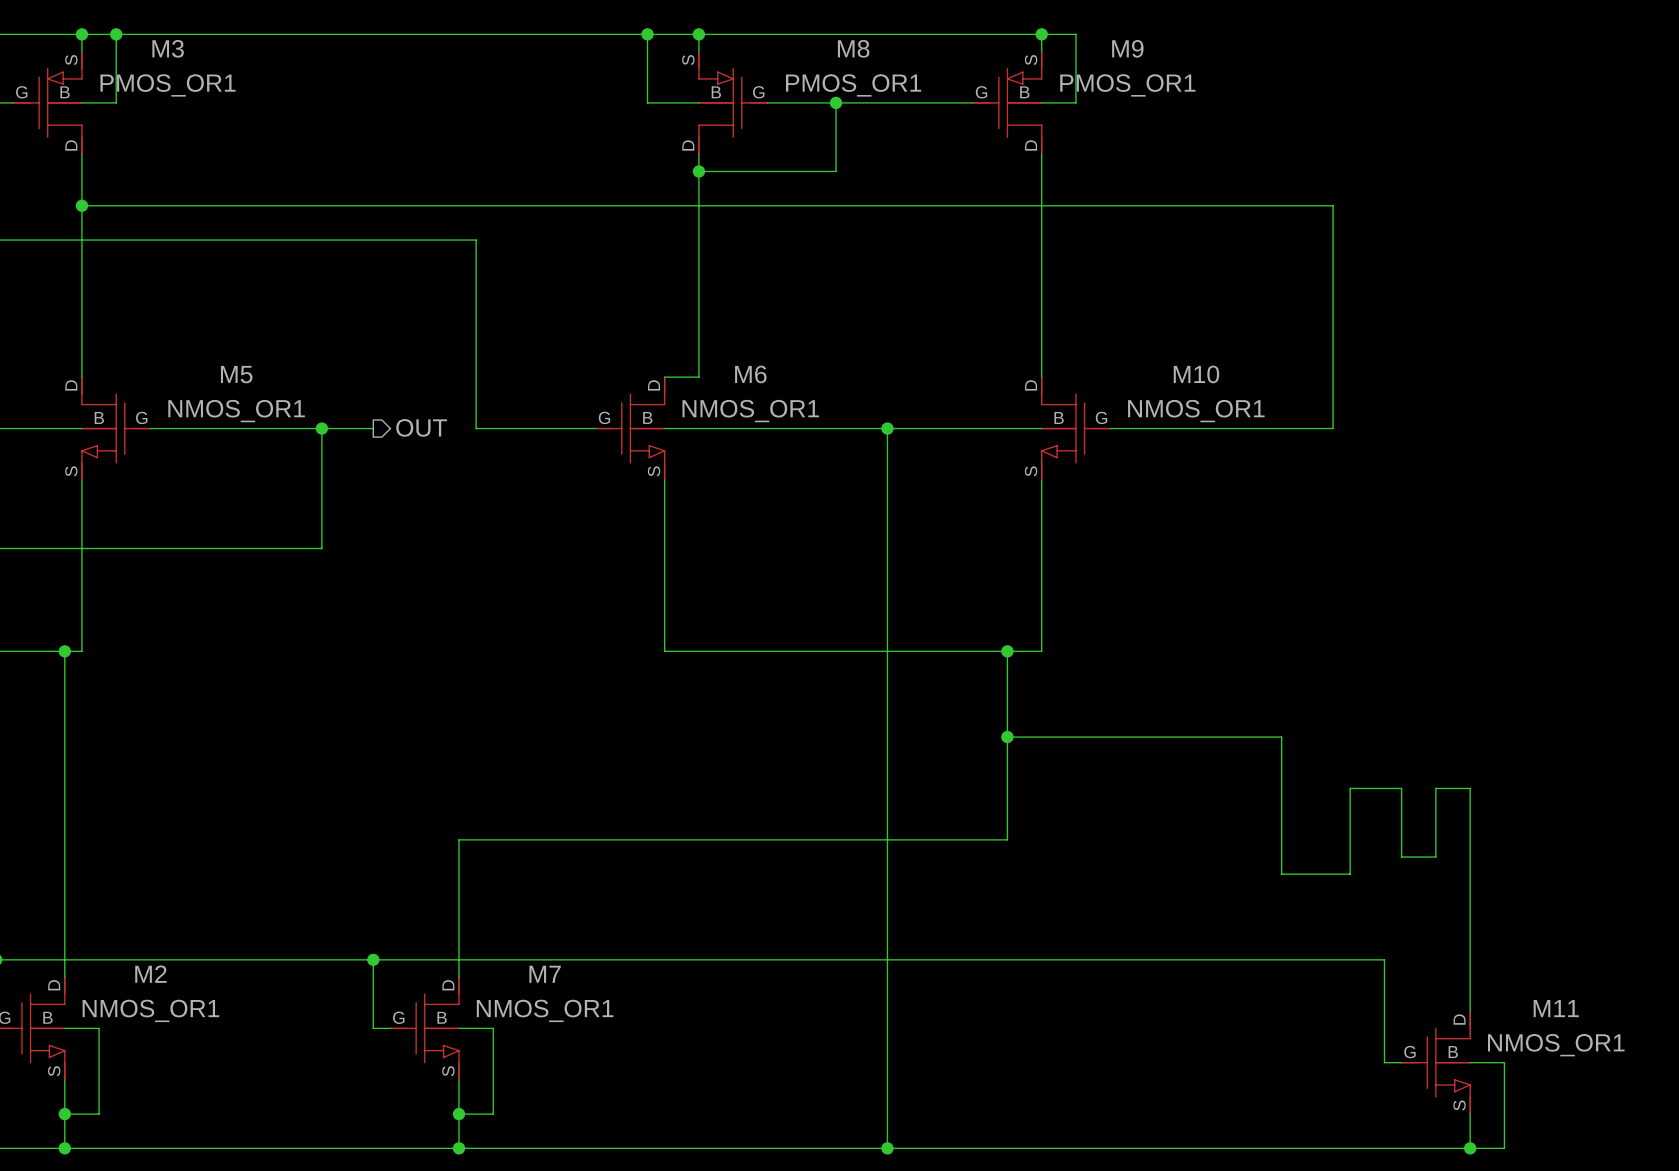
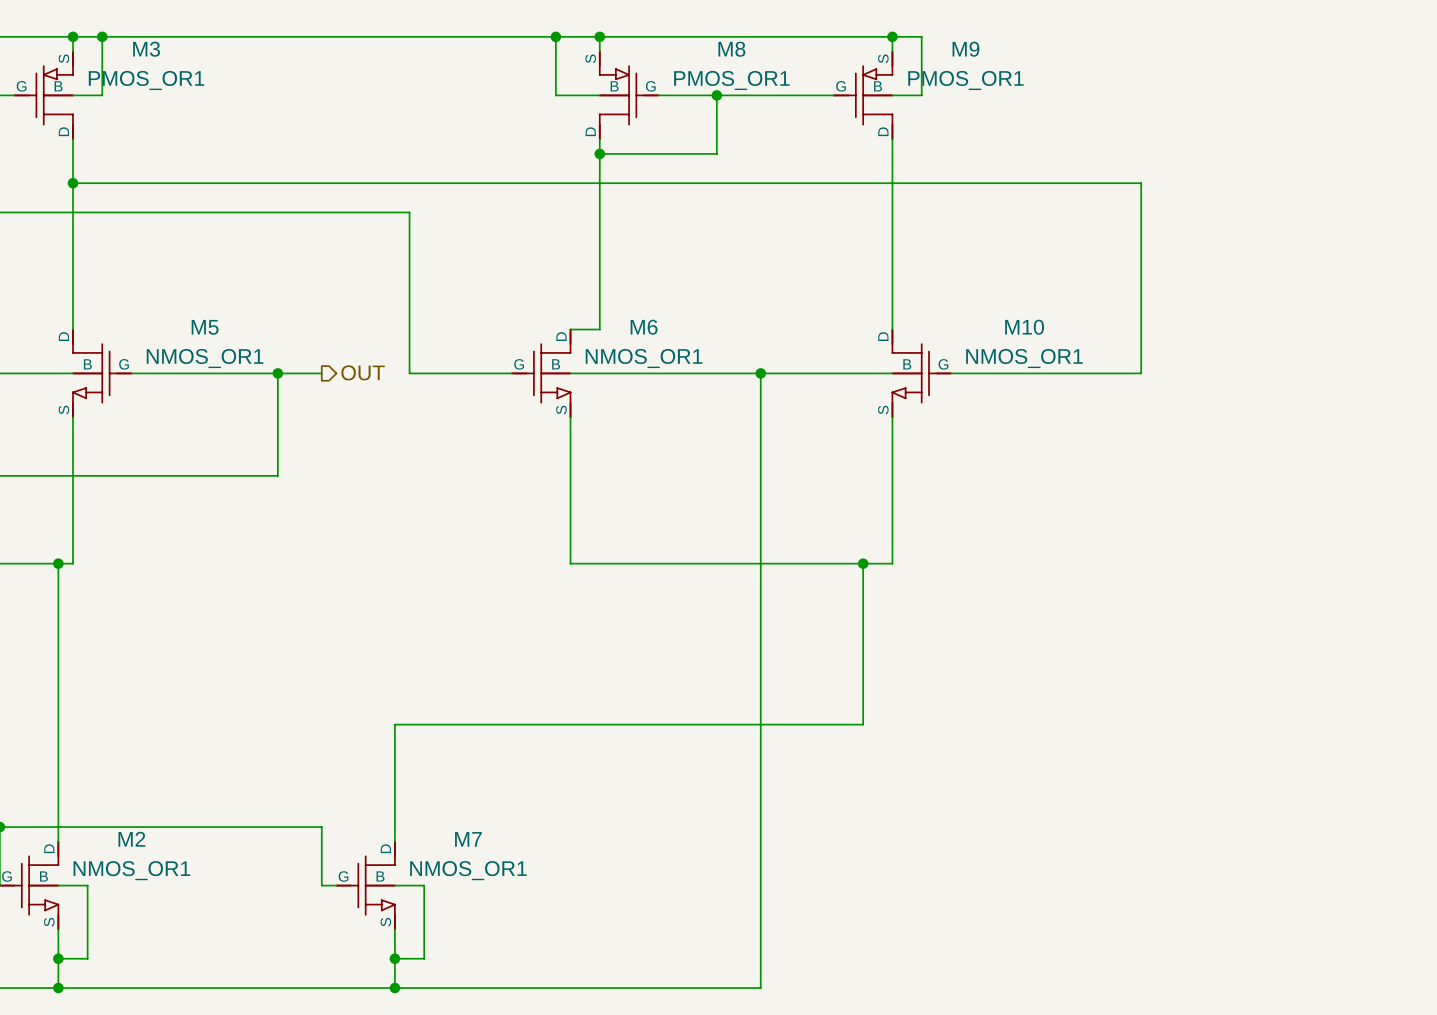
wire: (1007, 737) (1281, 737) (1281, 874) (1350, 874) (1350, 788) (1401, 788) (1401, 857) (1435, 857) (1435, 788) (1470, 788) (1470, 1011) -> none
junction: (1007, 737) -> none
wire: (373, 959) (1384, 959) (1384, 1062) (1401, 1062) -> none
junction: (373, 959) -> none
M11: NMOS_OR1 (1435, 1062) -> none
wire: (1470, 1062) (1504, 1062) (1504, 1148) (887, 1148) -> none
wire: (1470, 1114) (1470, 1148) -> none
junction: (887, 1148) -> none
junction: (1470, 1148) -> none

